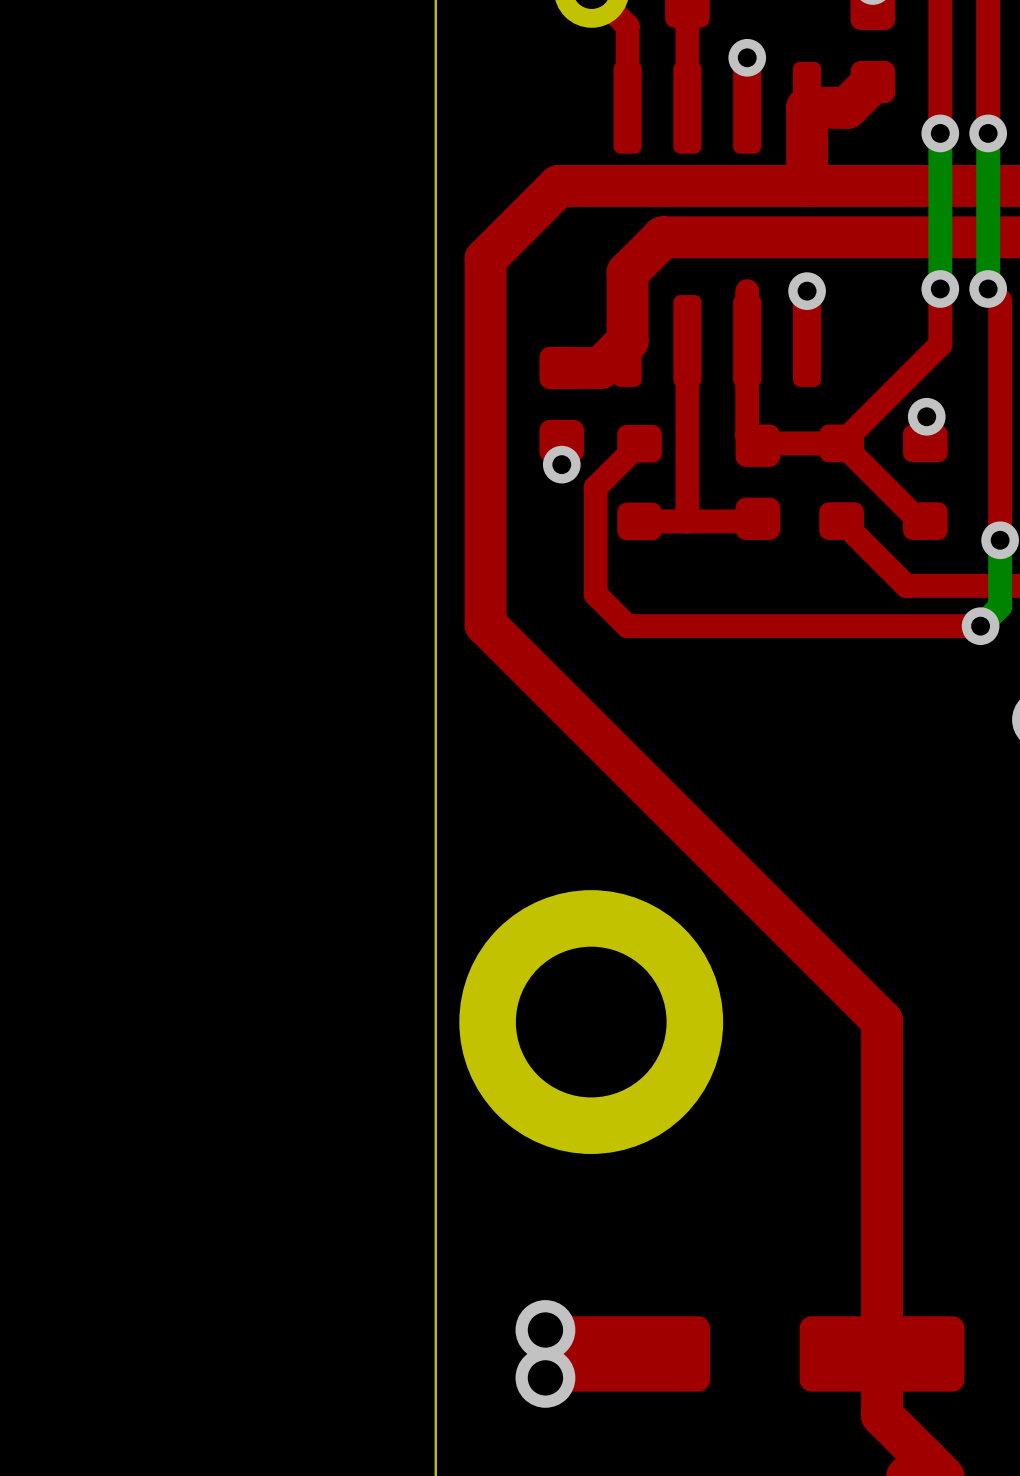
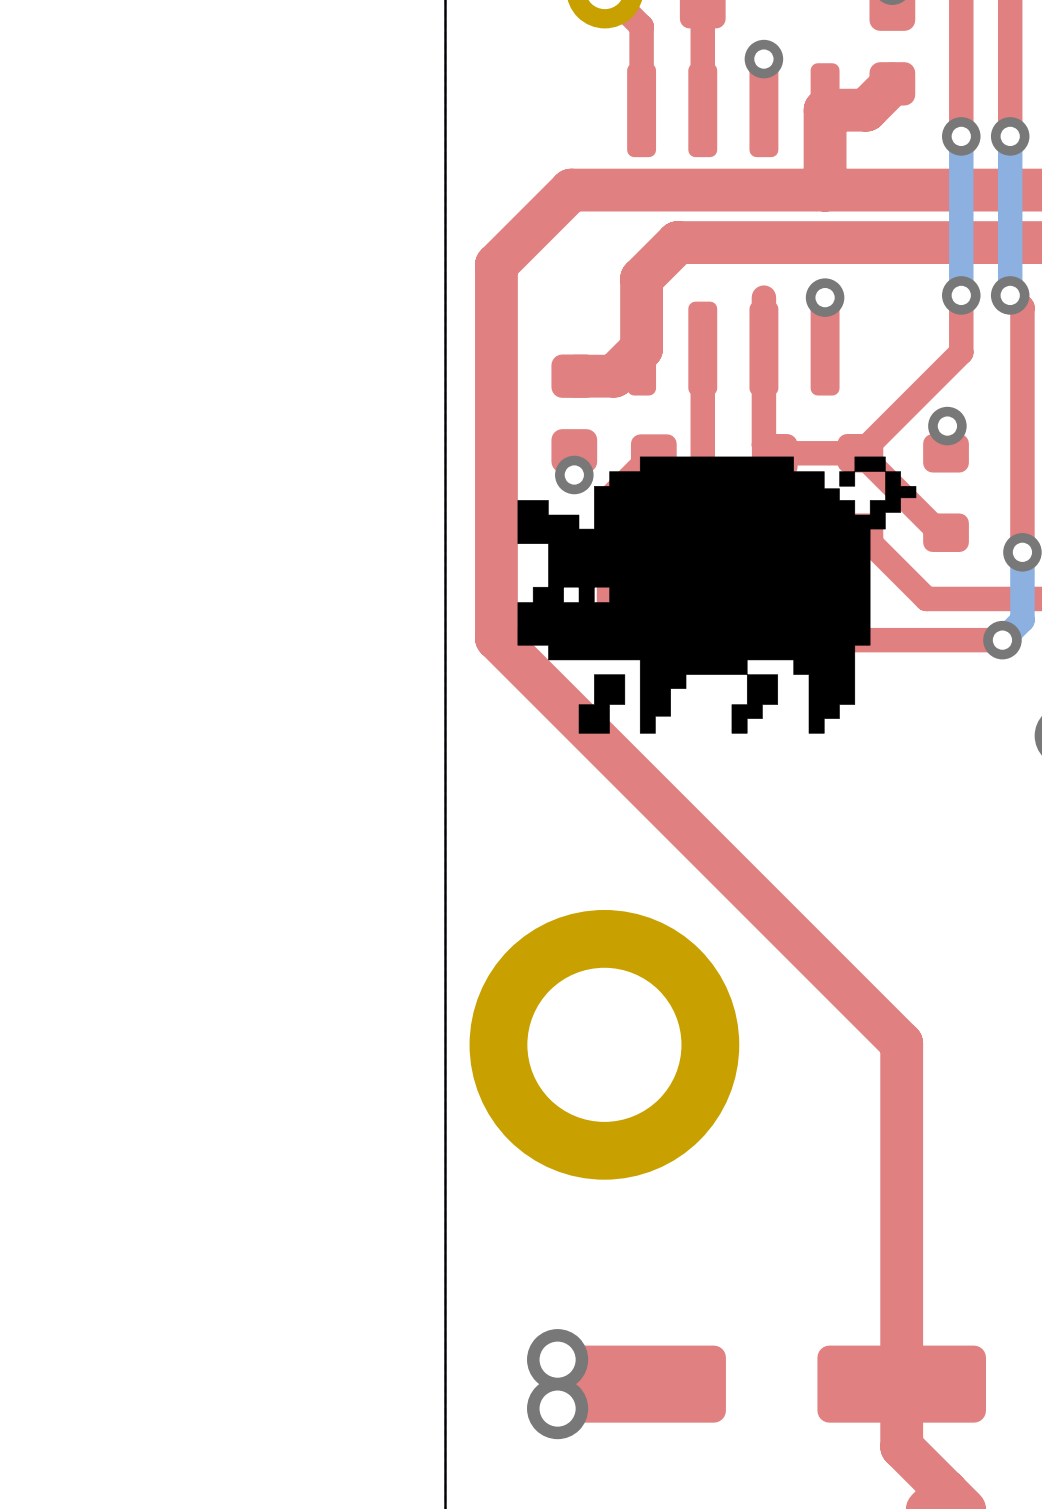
drawing: none -> [517, 456, 917, 734]

